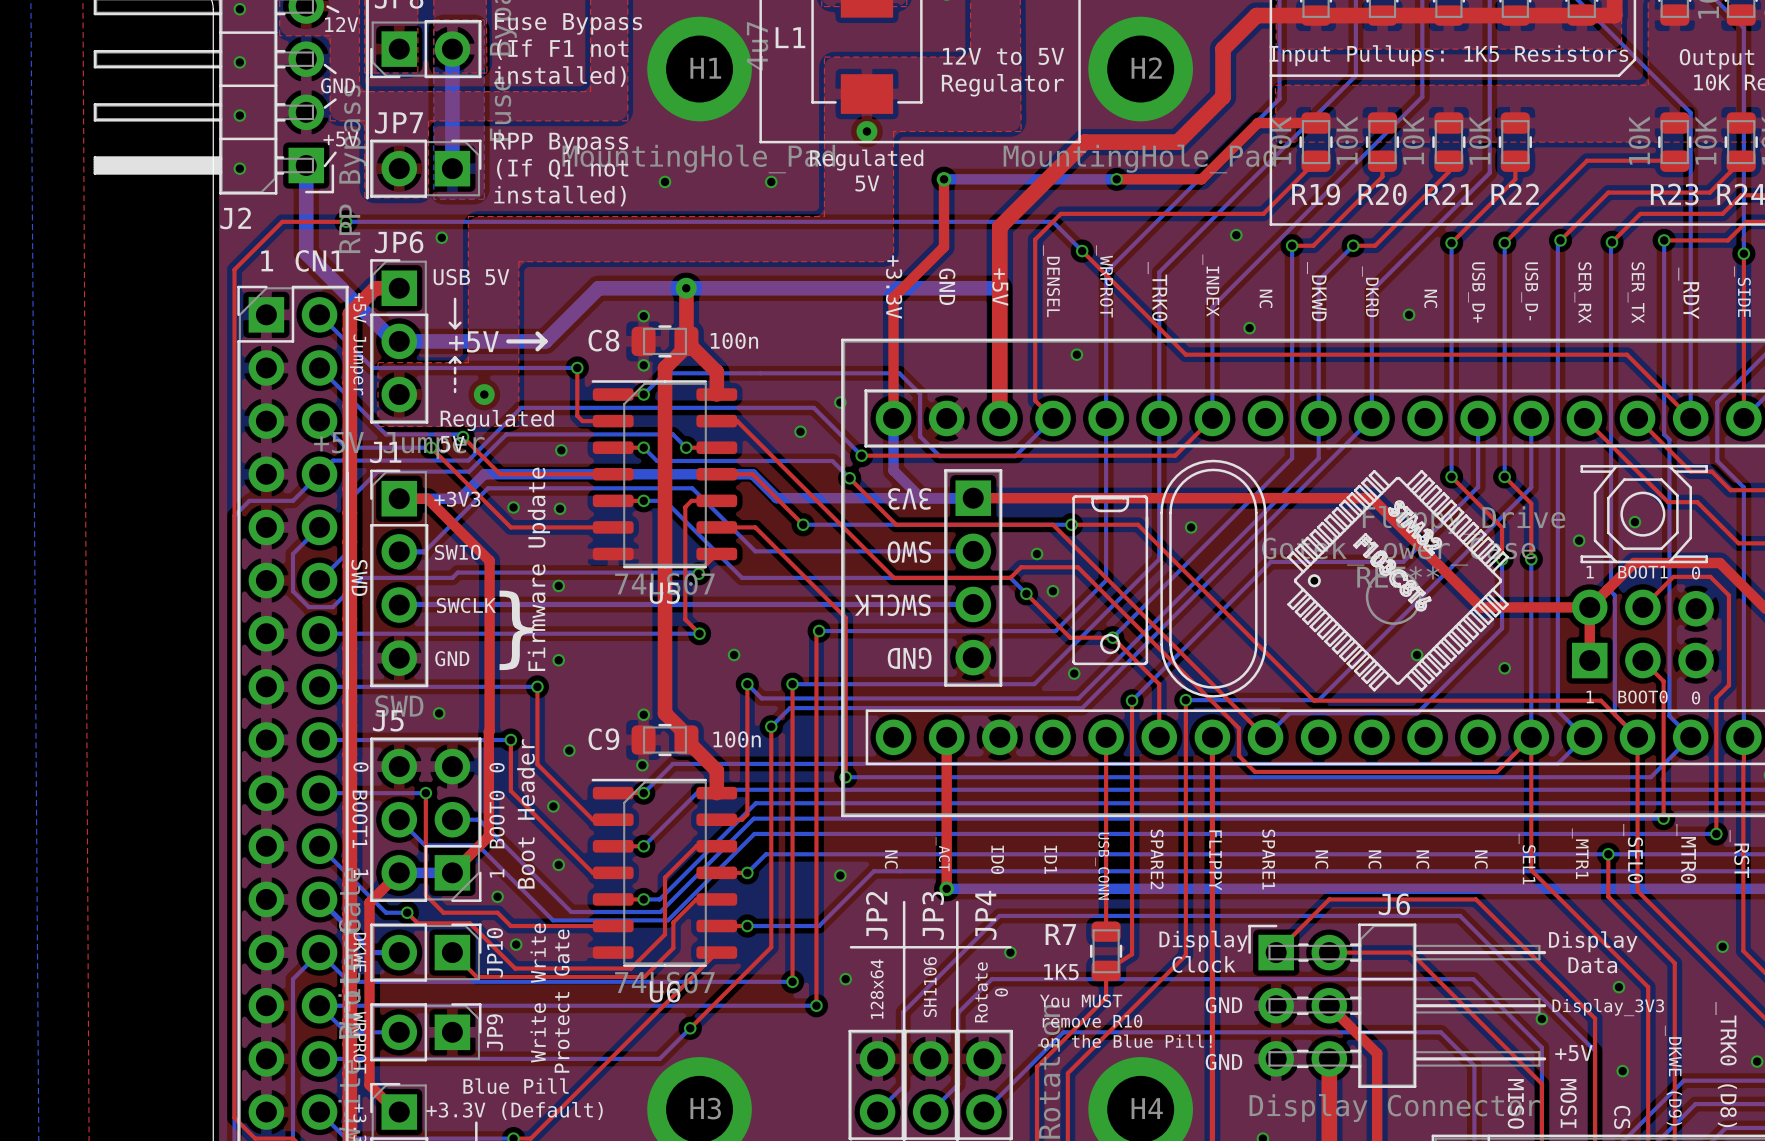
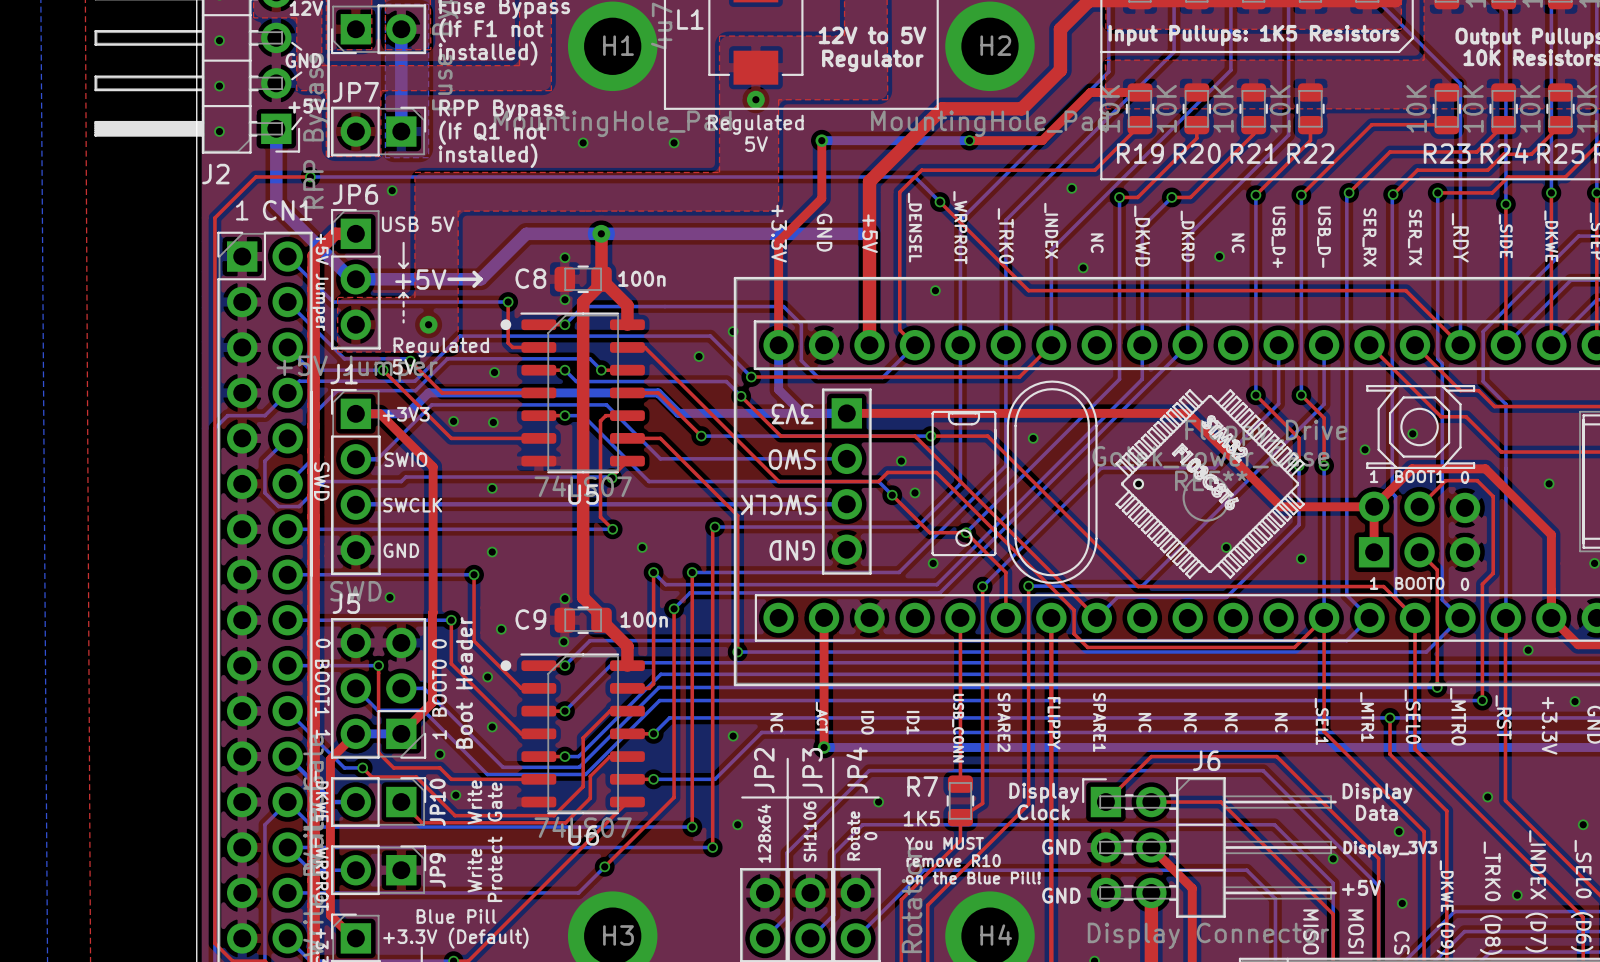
drawing: none -> [500, 319, 512, 331]
text: Firmware Update (538, 569) -> none
text: { (516, 630) -> none
drawing: none -> [500, 660, 512, 672]

